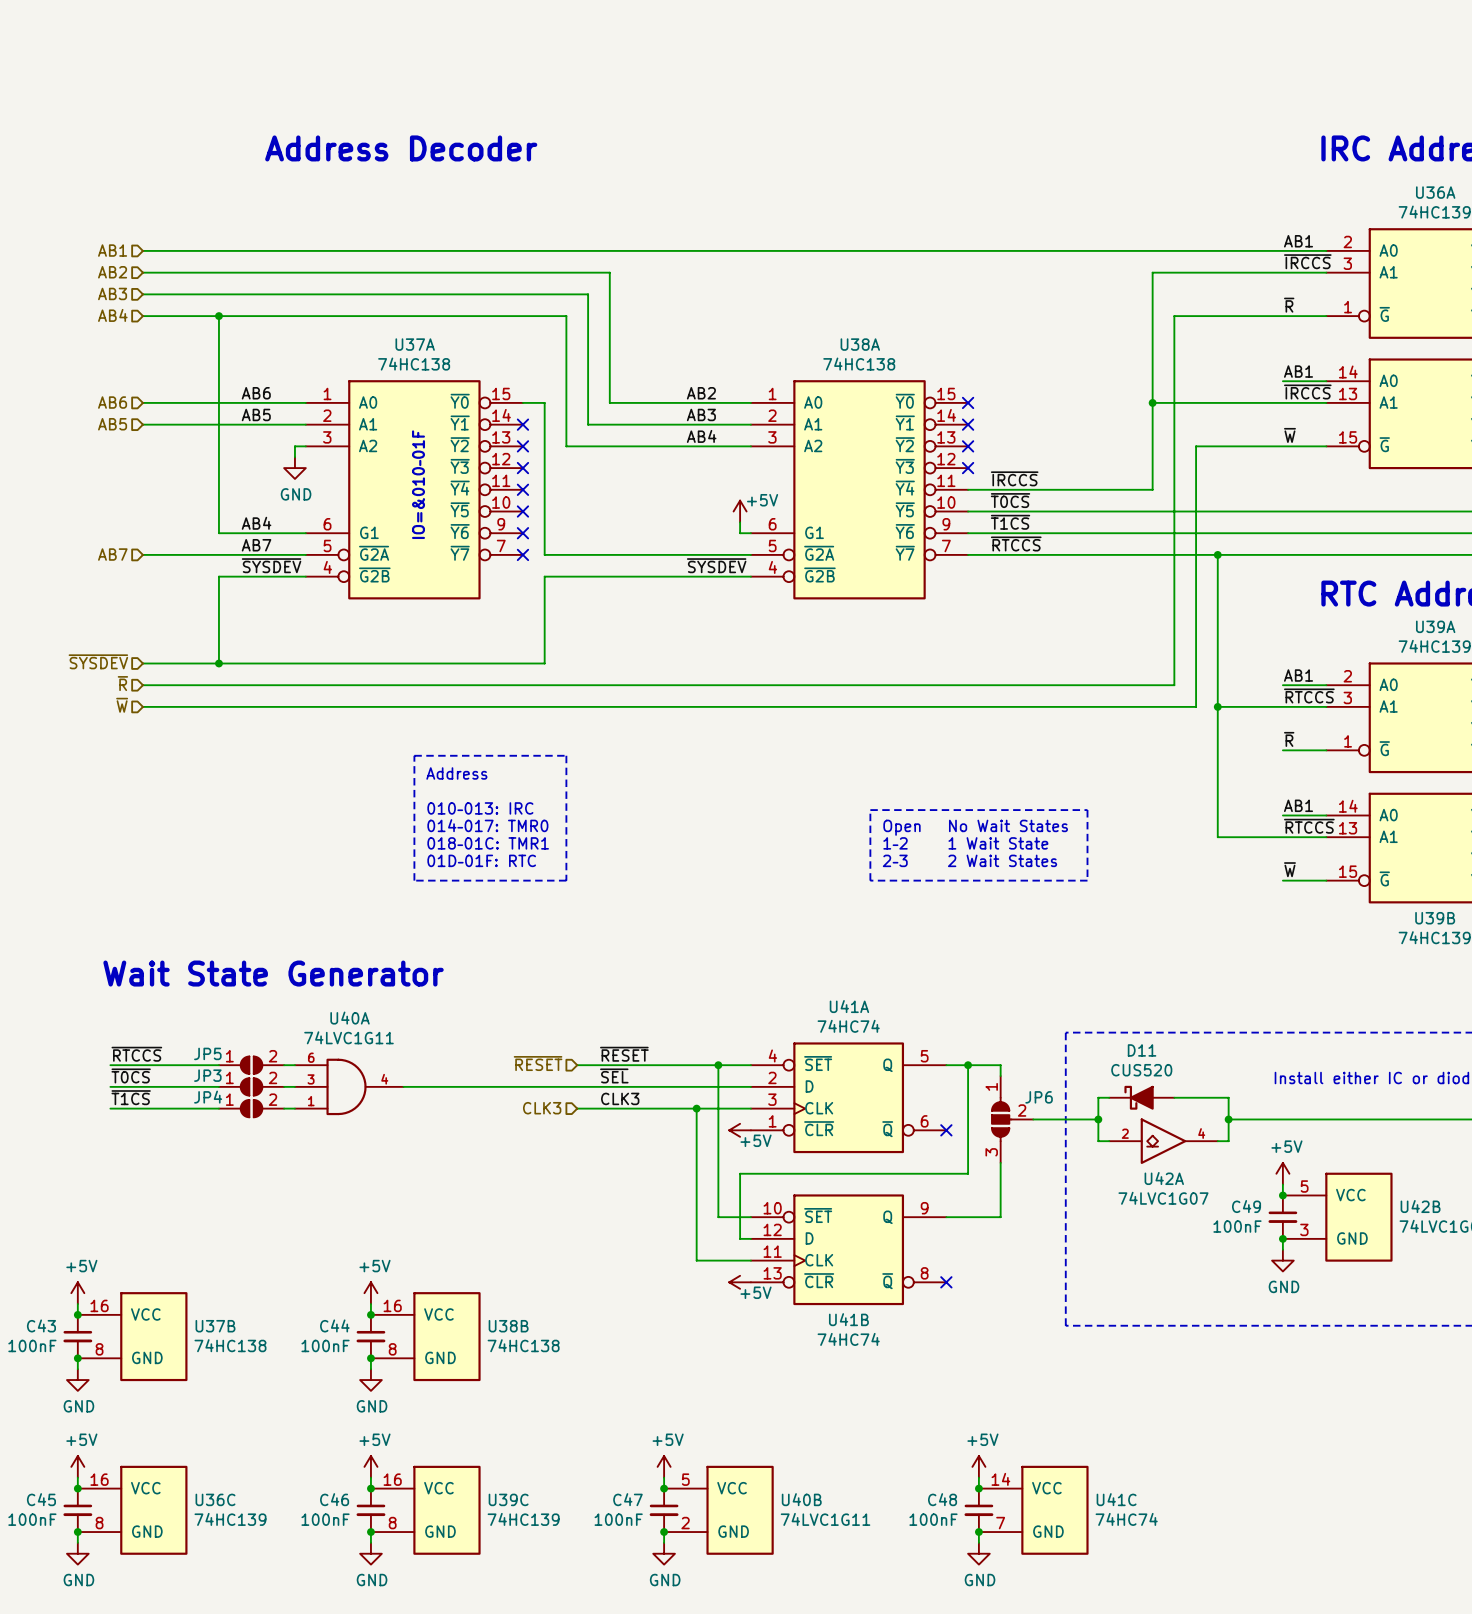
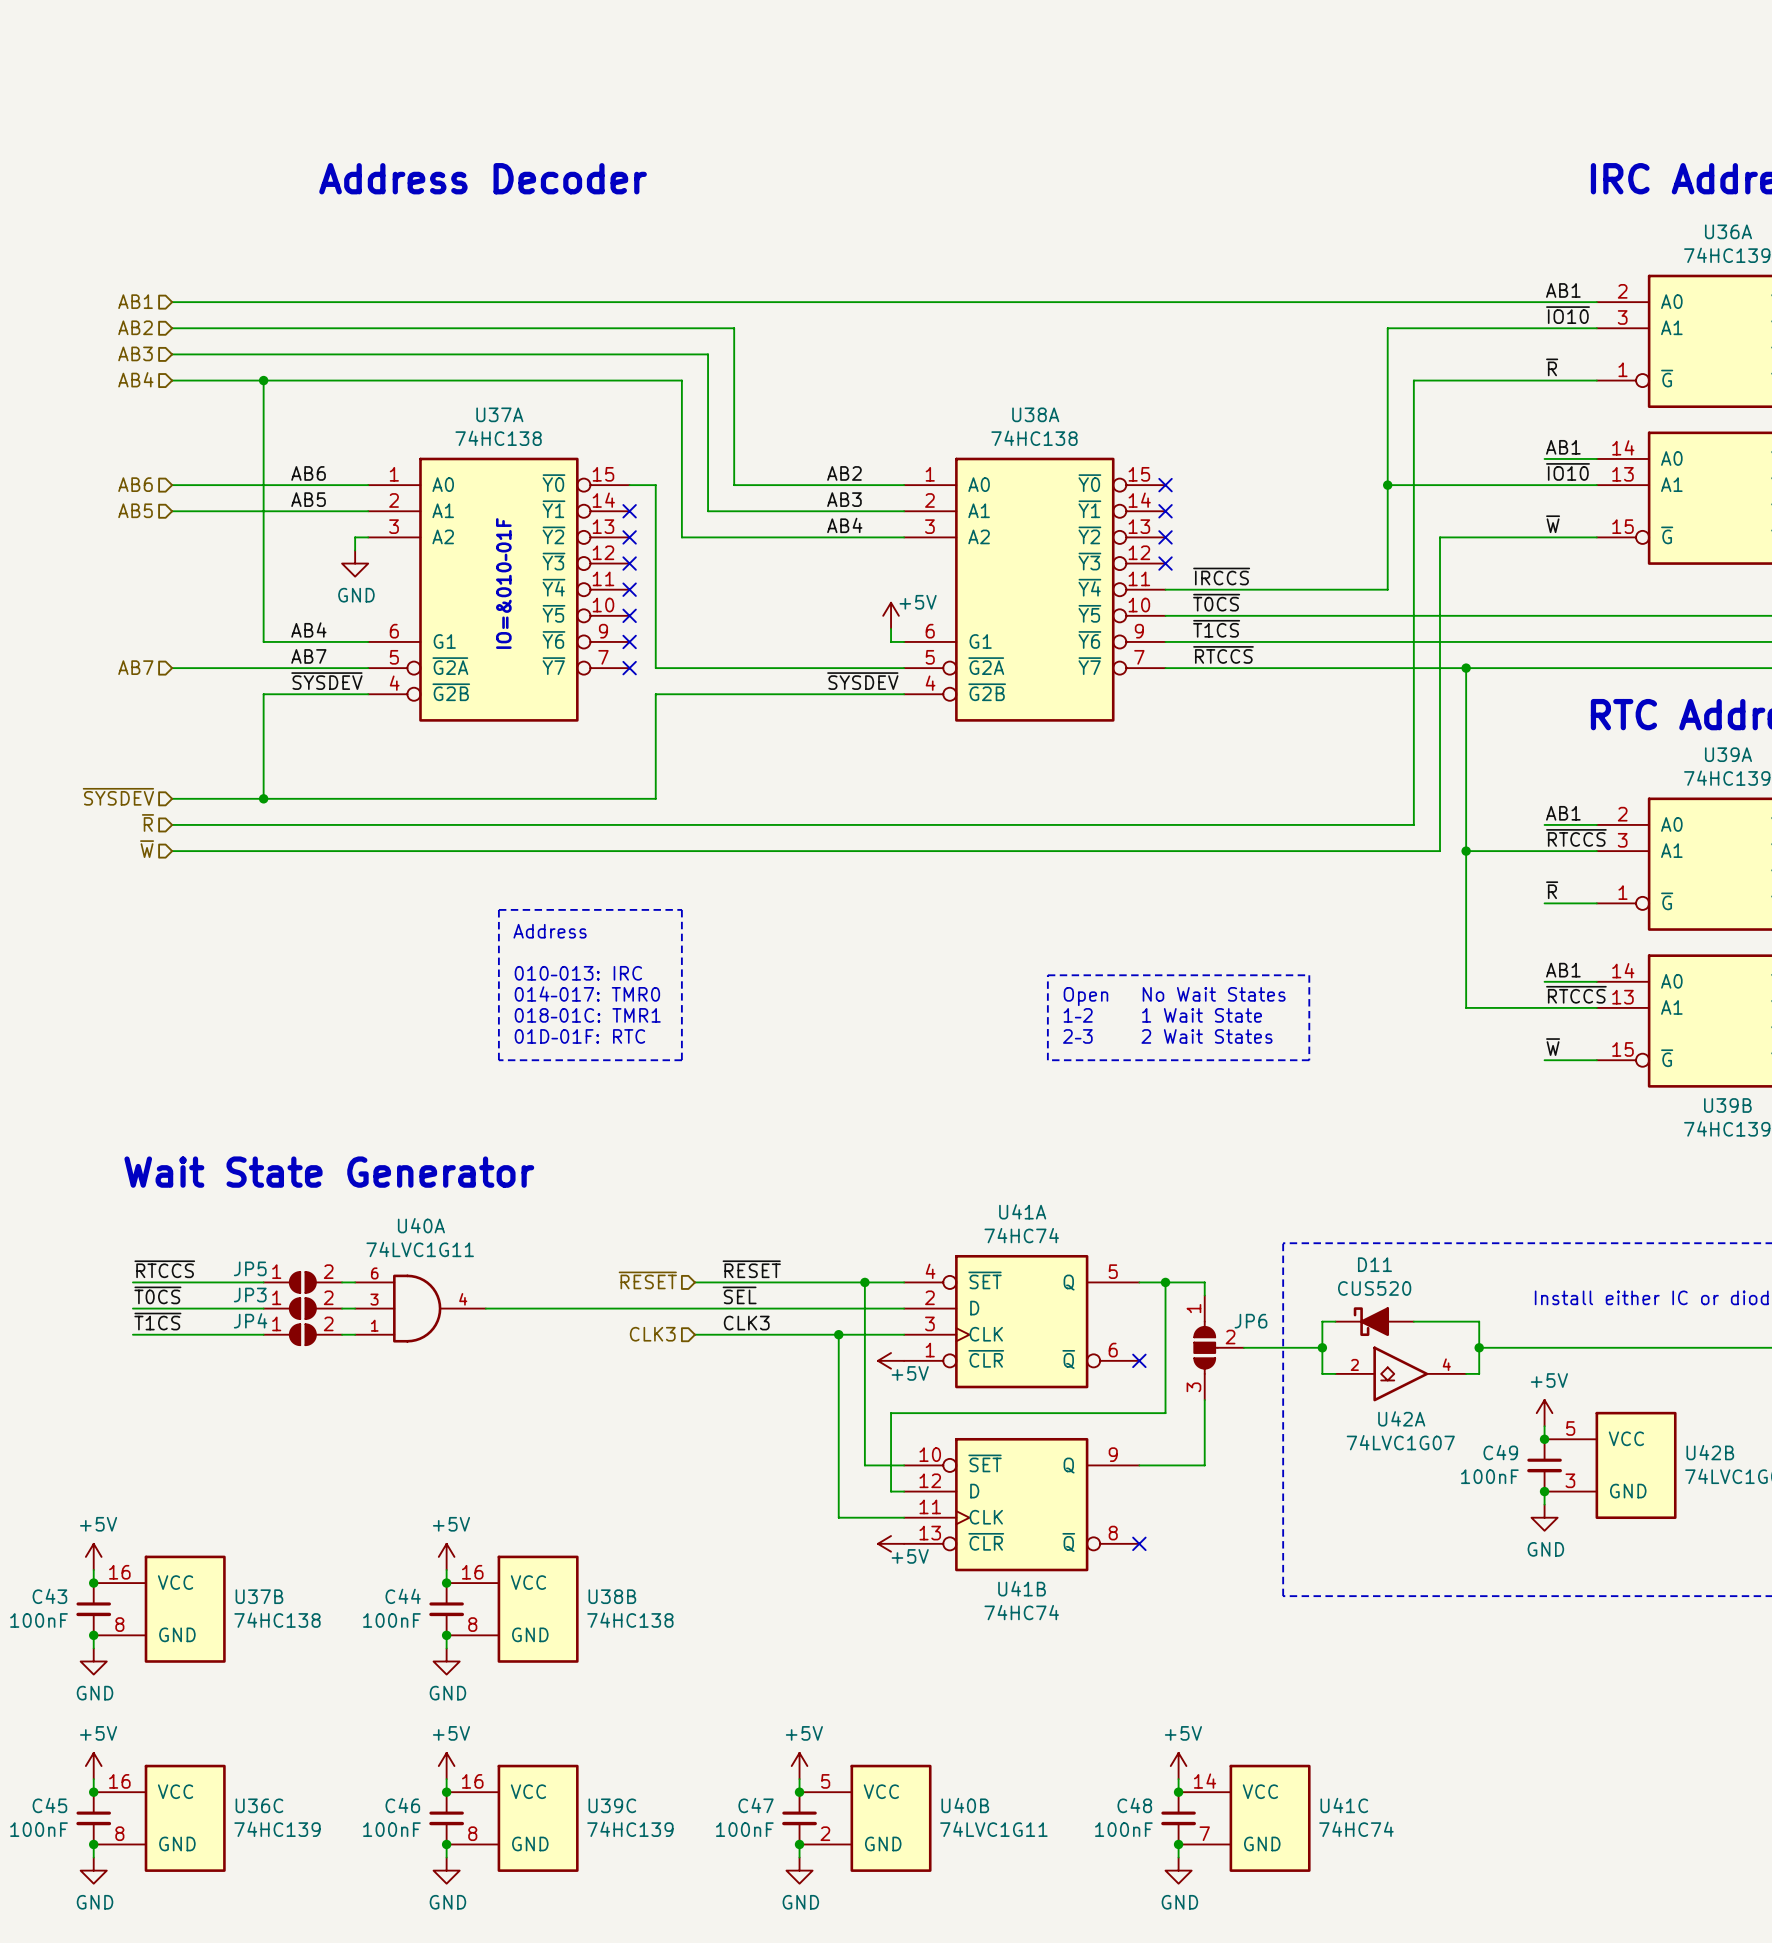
label: ~{IRCCS} (1307, 261) -> ~{IO10} (1568, 315)
label: ~{IRCCS} (1307, 392) -> ~{IO10} (1568, 471)

